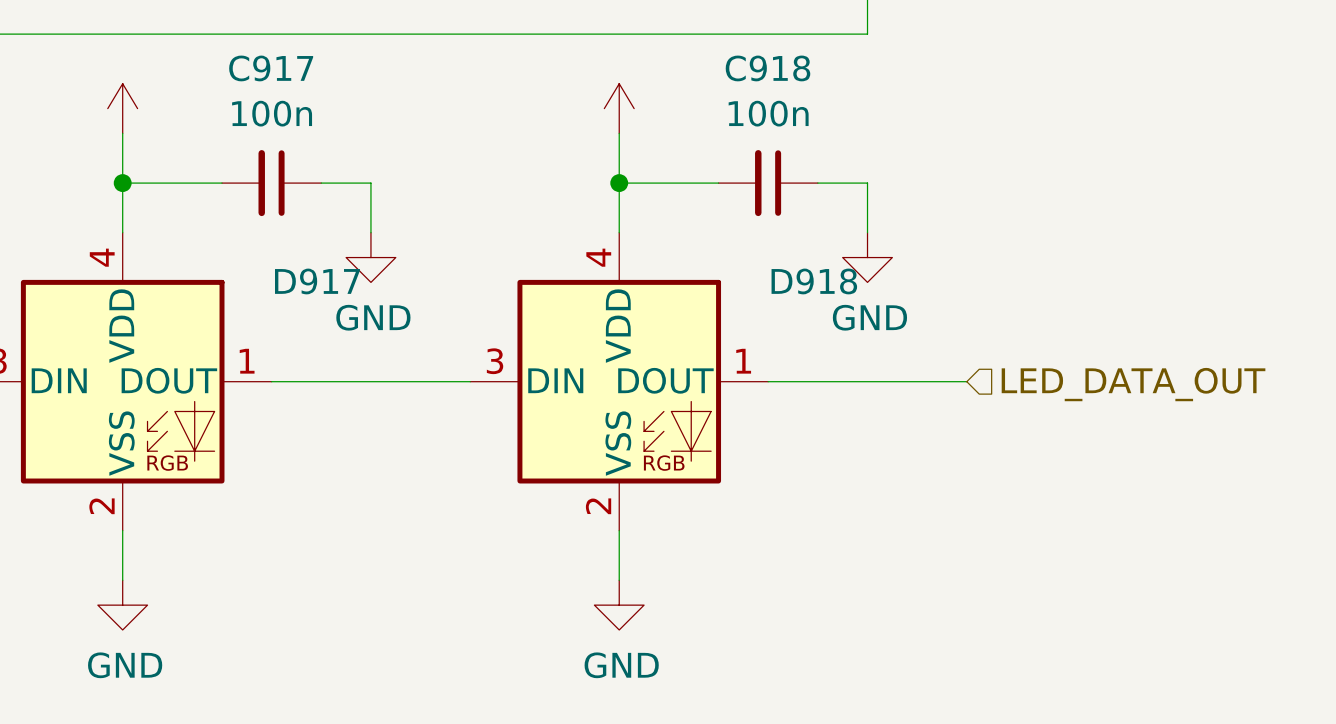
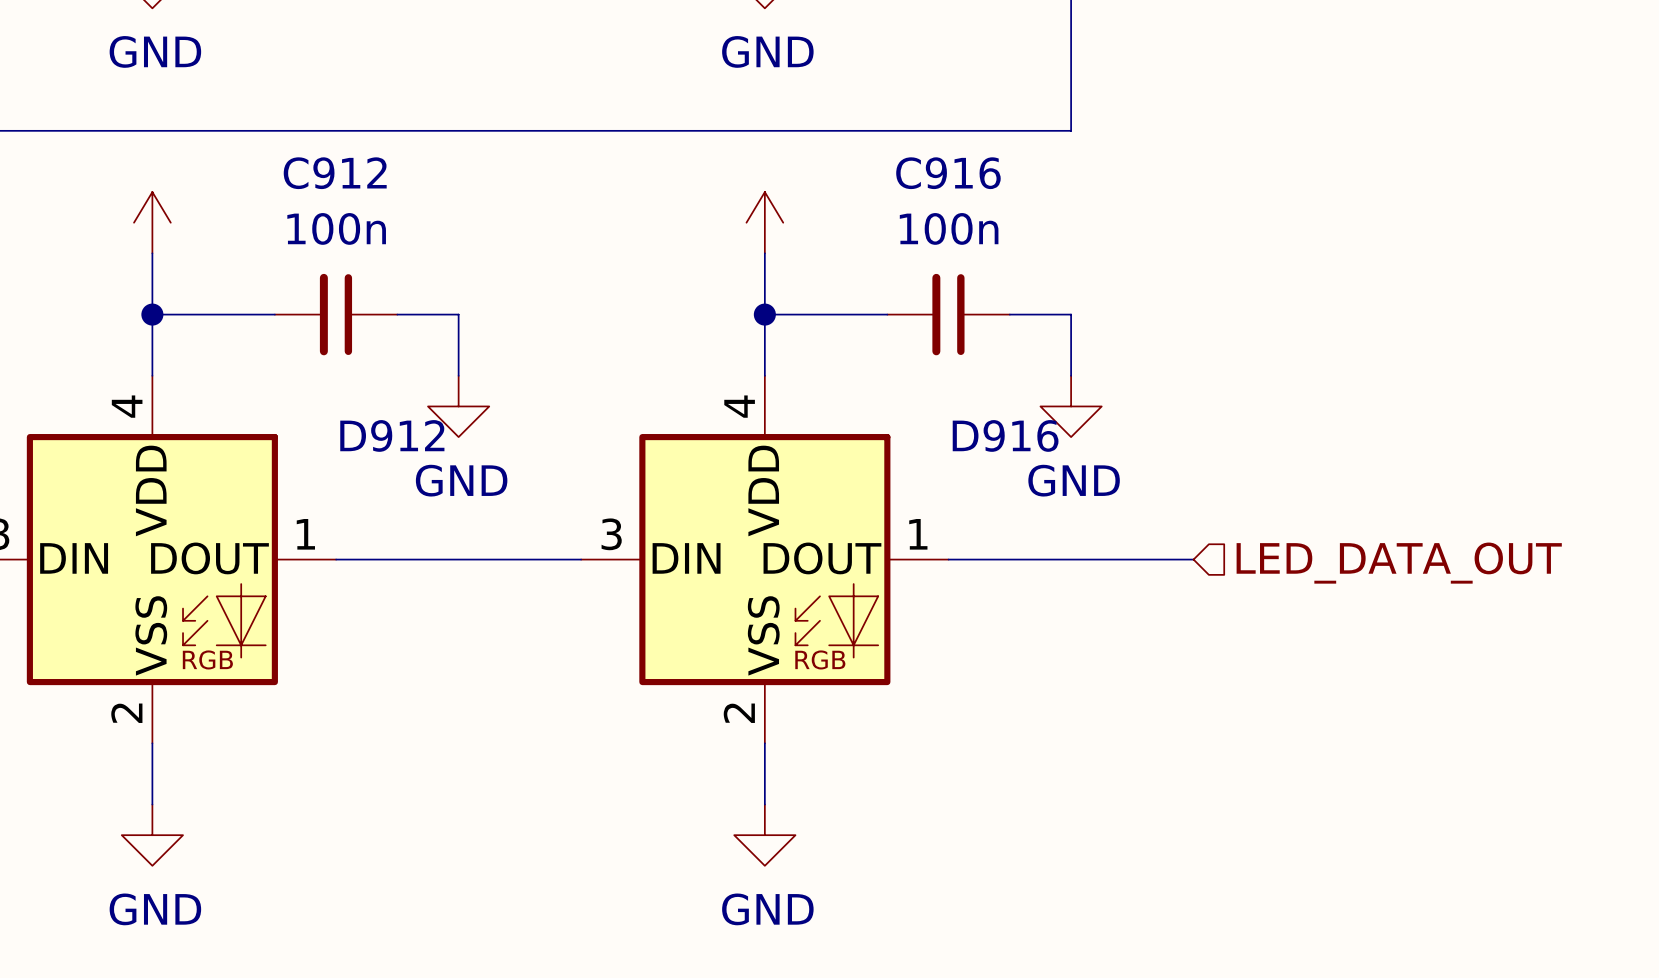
C917 name: C917 (271, 68) -> C912 (335, 173)
C918 name: C918 (767, 68) -> C916 (948, 173)
D917 name: D917 (317, 281) -> D912 (392, 435)
D918 name: D918 (814, 281) -> D916 (1005, 435)

